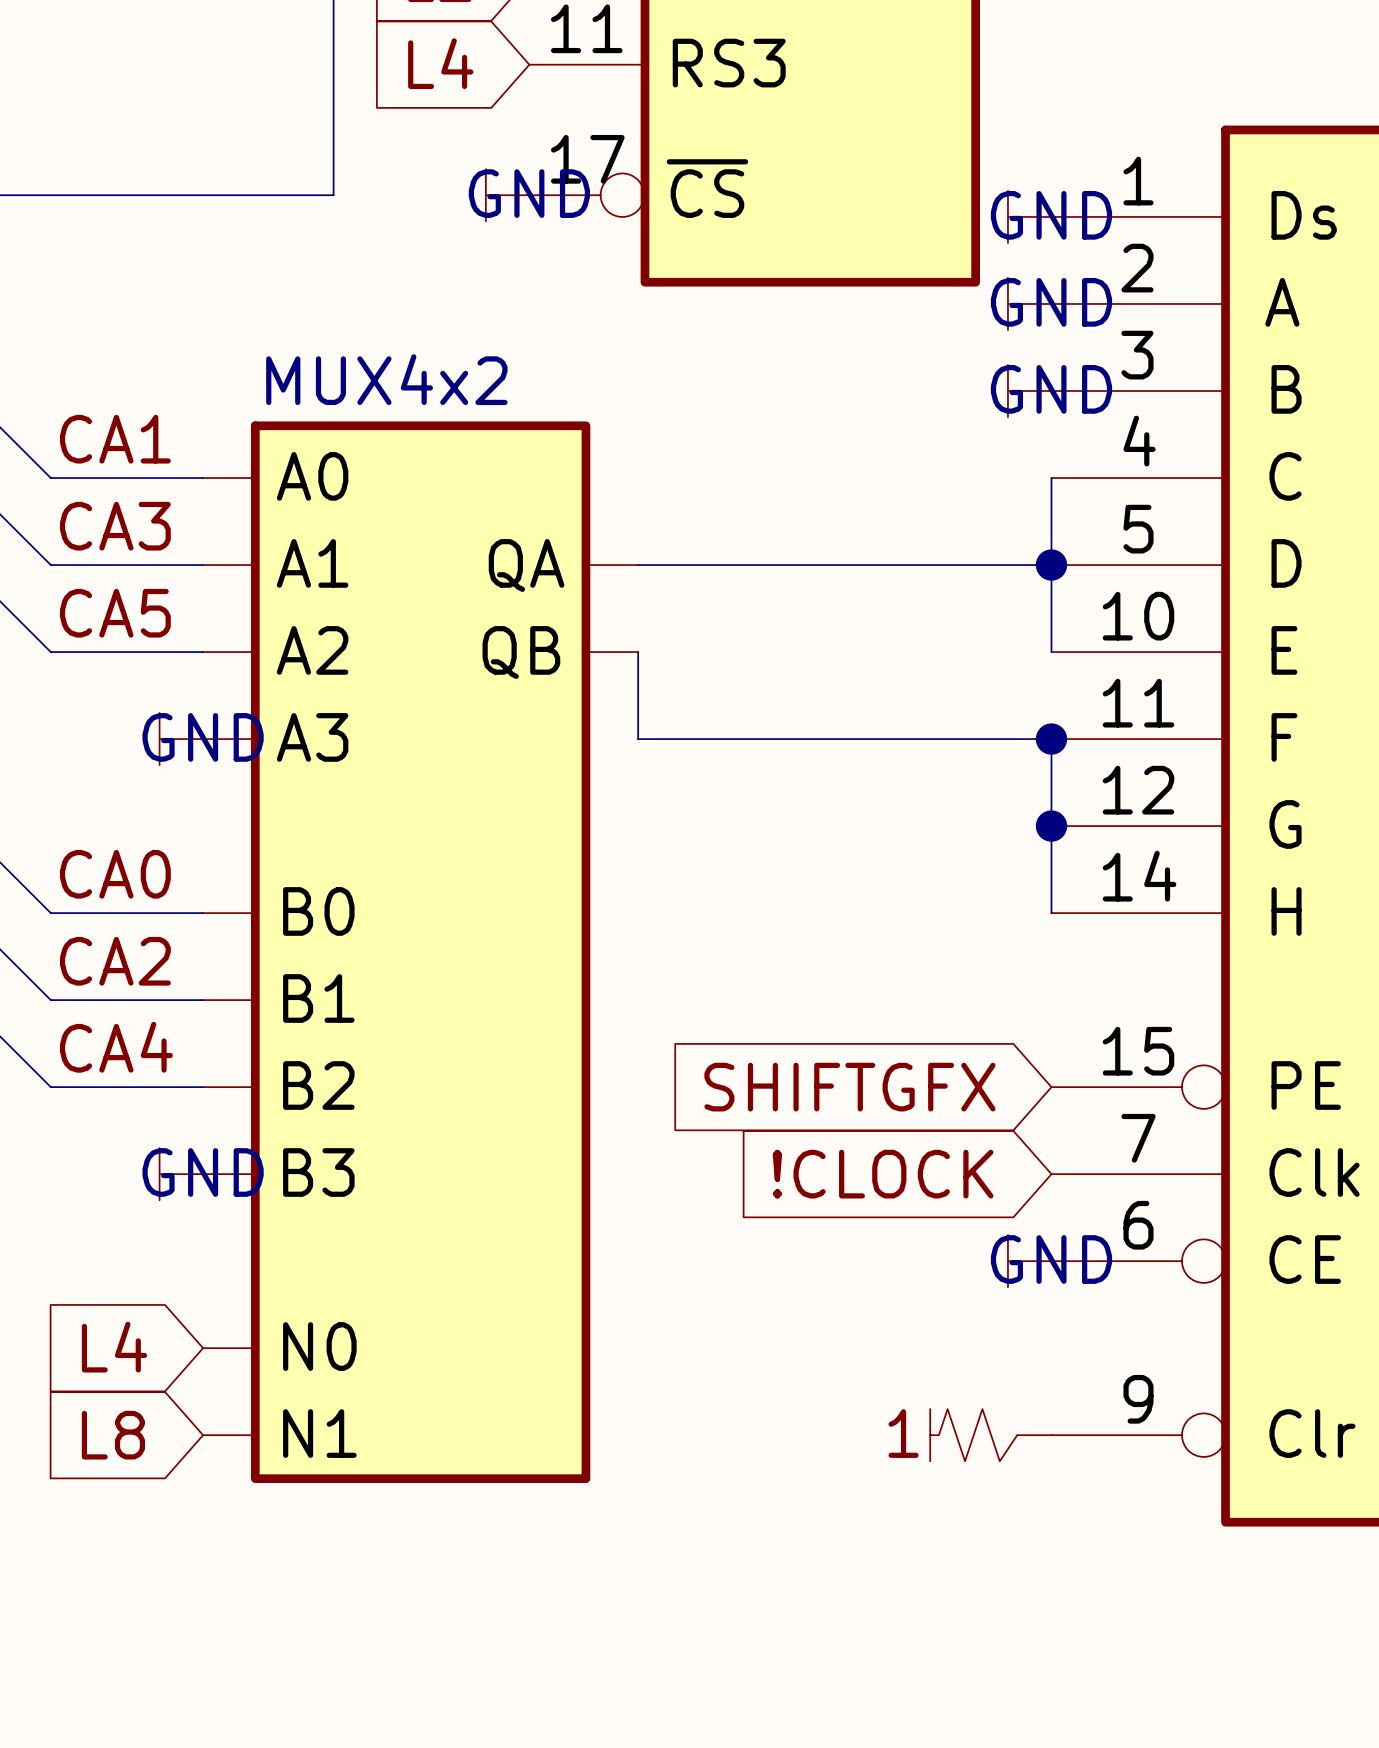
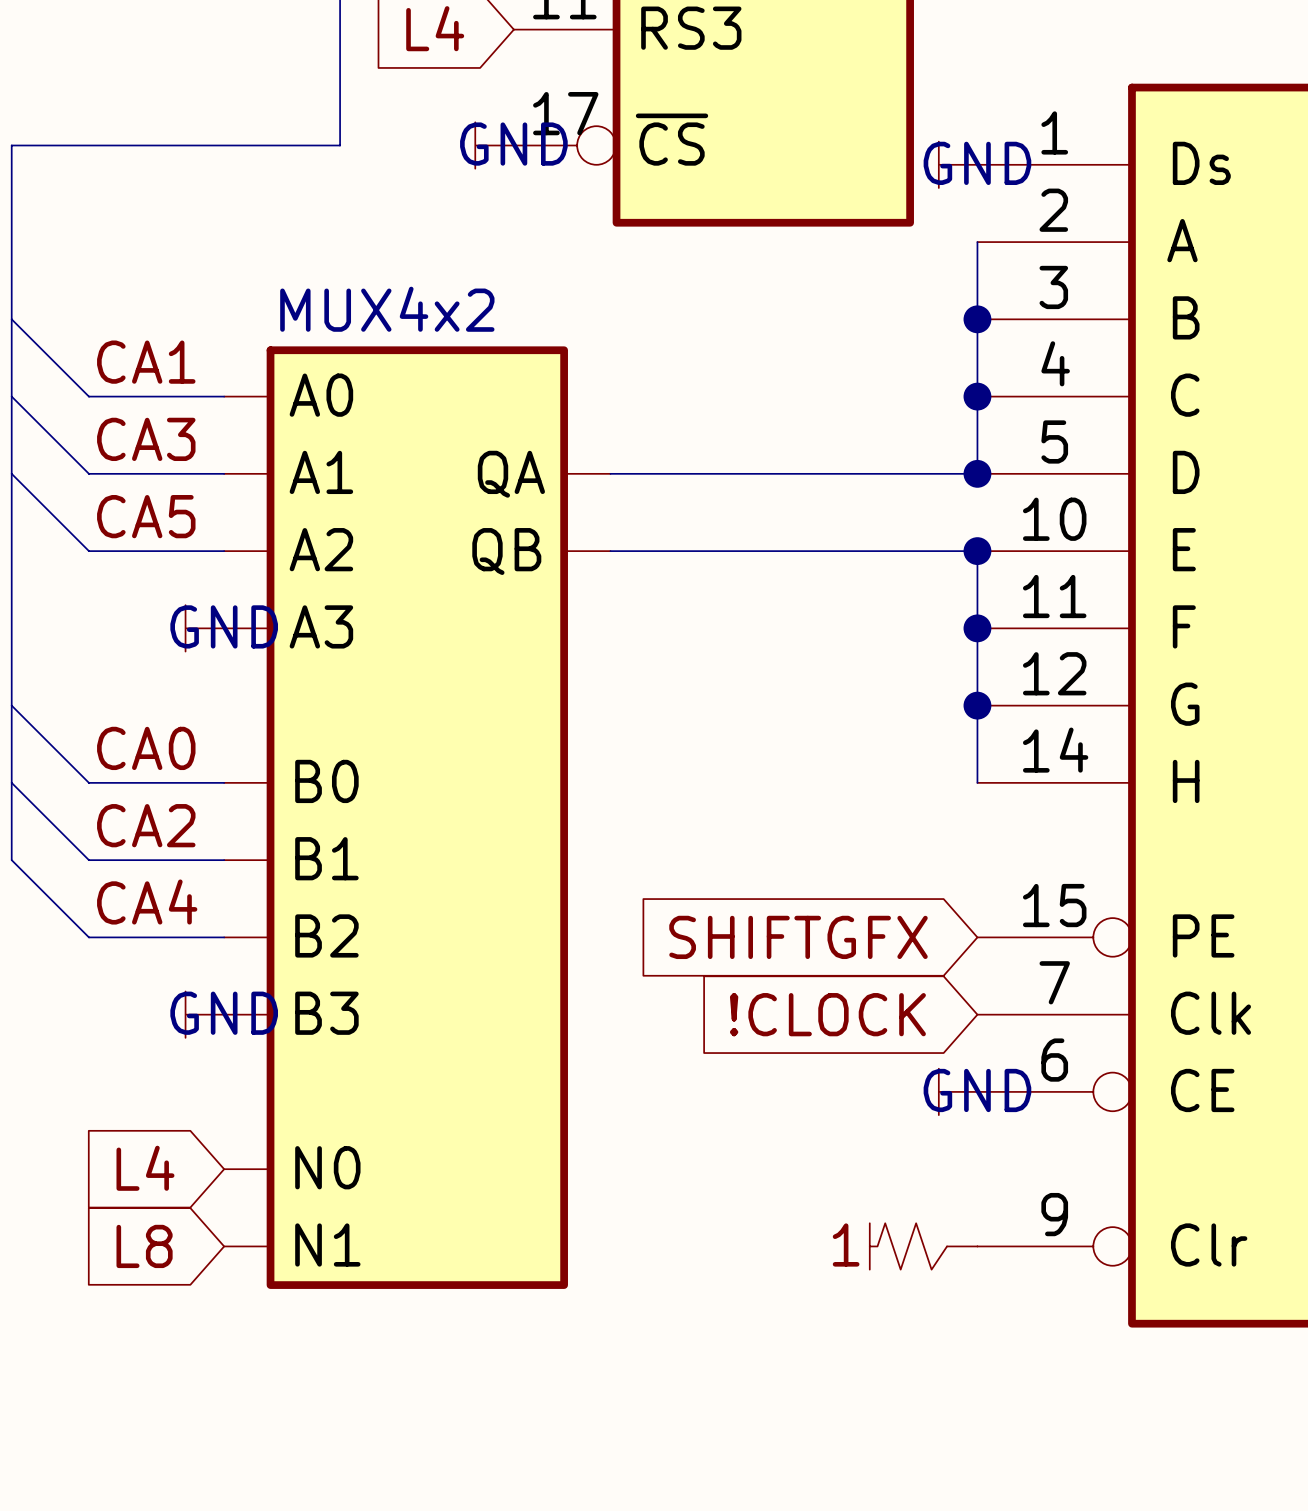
power symbol: GND (1029, 303) -> none
wire: none -> (977, 242) (977, 396)
power symbol: GND (1029, 391) -> none
junction: none -> (977, 319)
junction: none -> (977, 396)
wire: (1051, 565) (1051, 652) -> none
wire: (638, 652) (638, 739) (1051, 739) -> (610, 551) (977, 551) (977, 628)
junction: none -> (977, 551)

